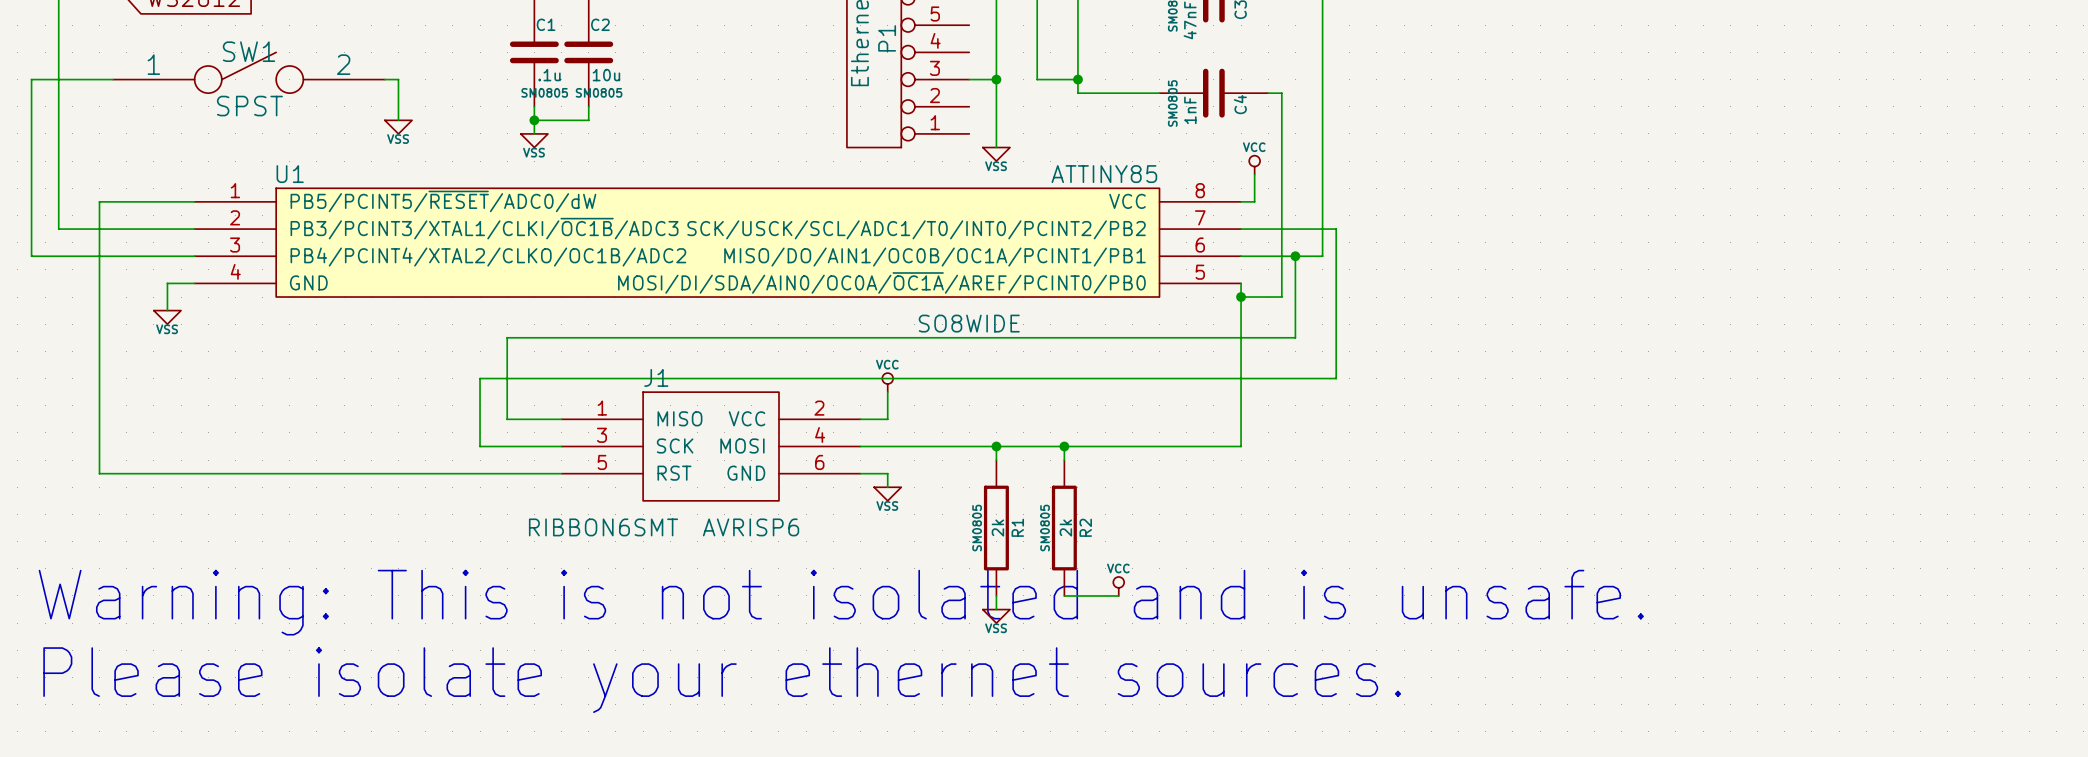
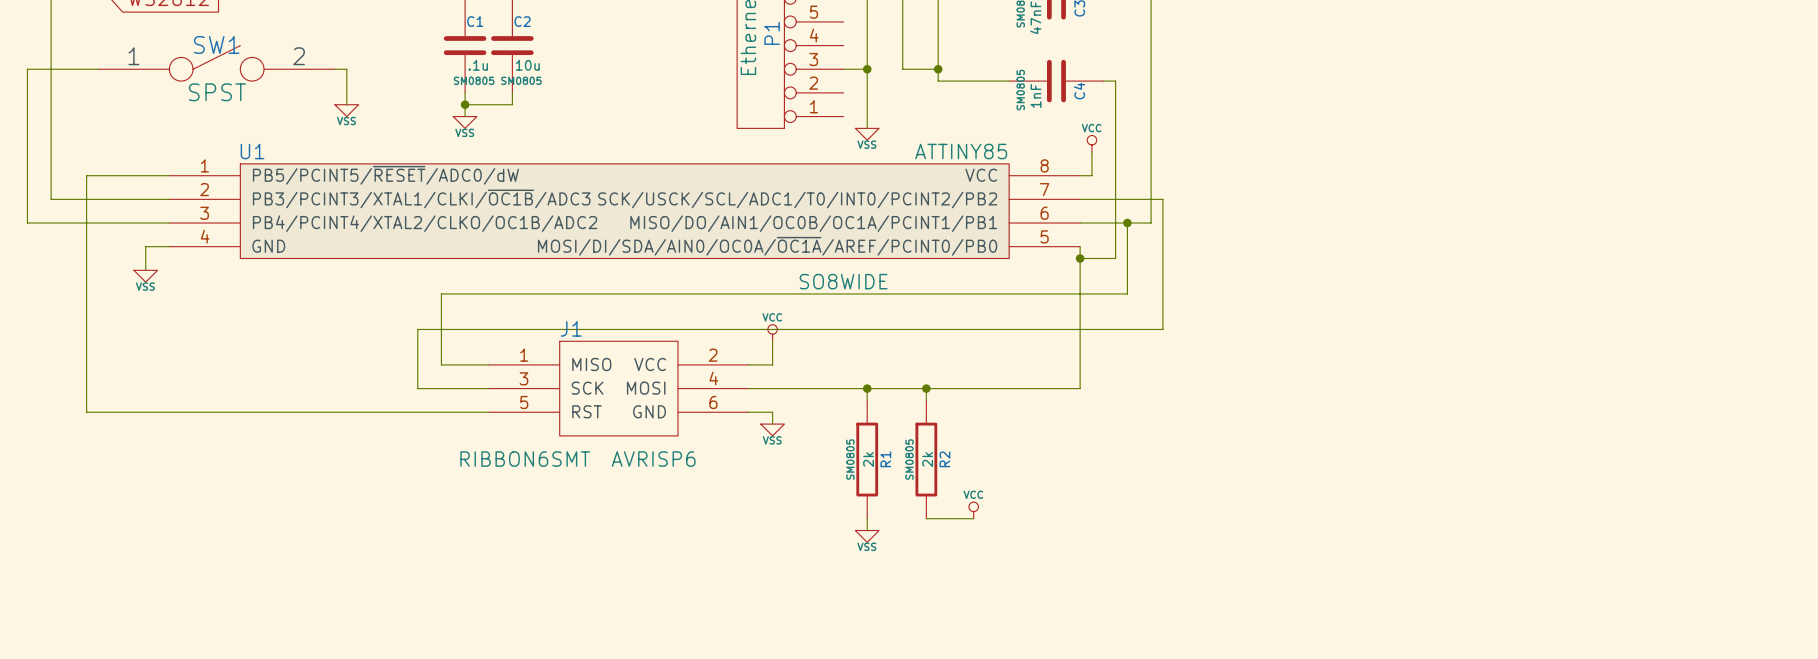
text: Warning: This is not isolated and is unsafe. (841, 602) -> none
text: Please isolate your ethernet sources. (722, 680) -> none

